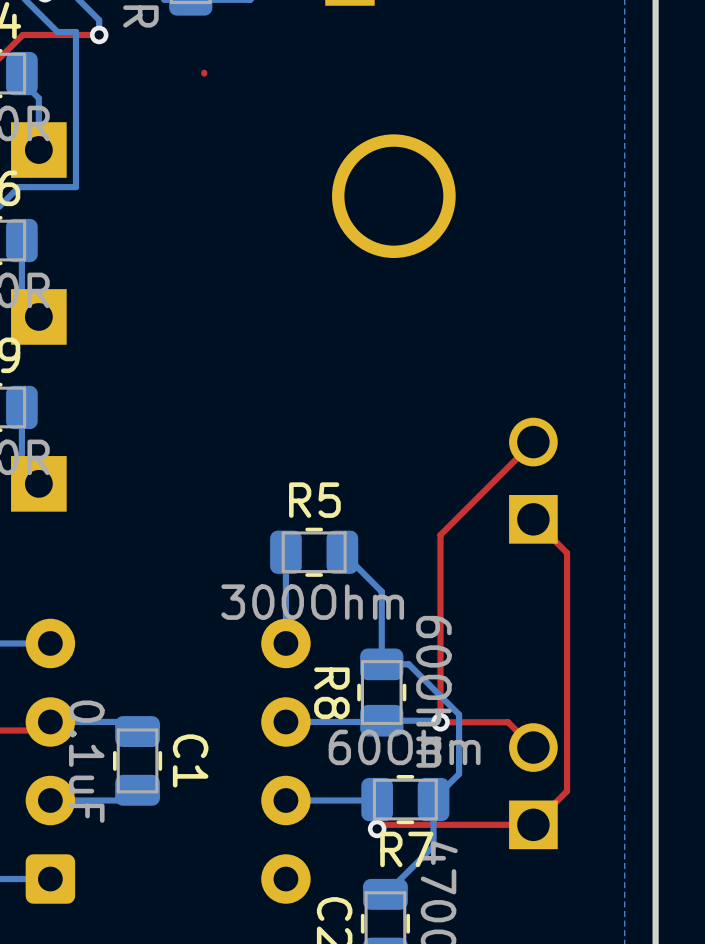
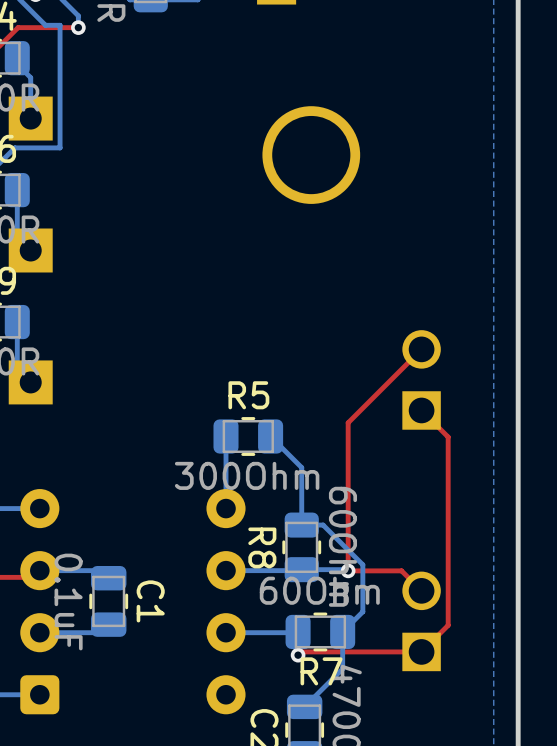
top track: (204, 72) (204, 73) -> none

